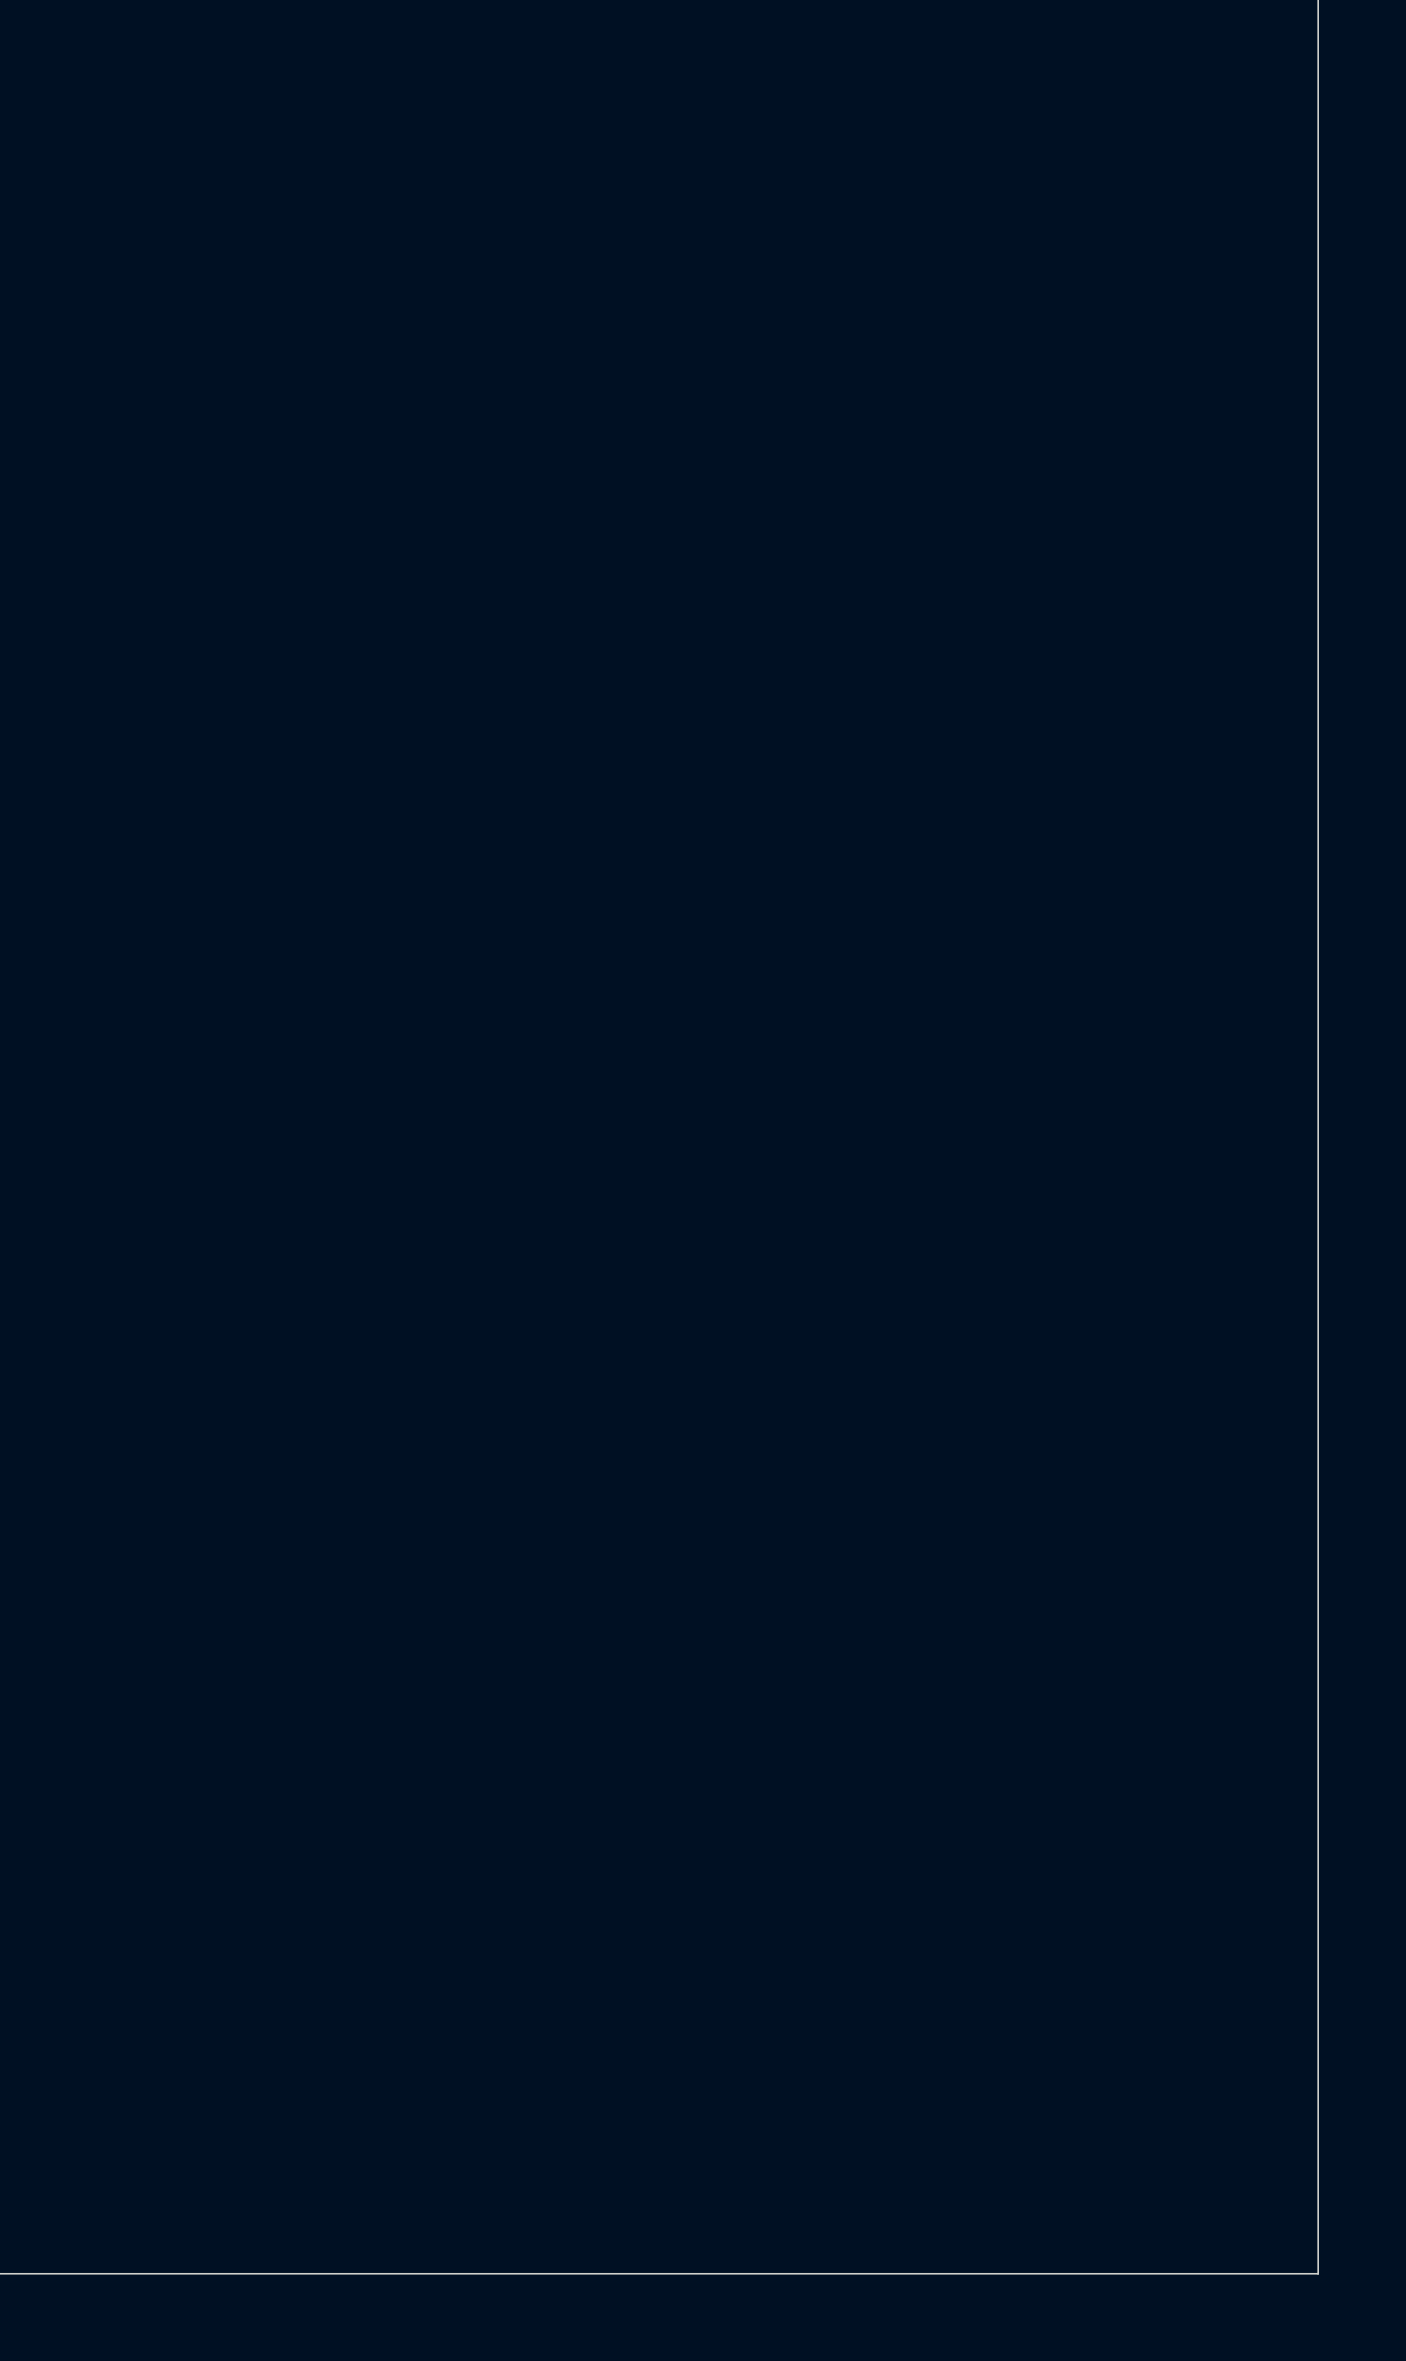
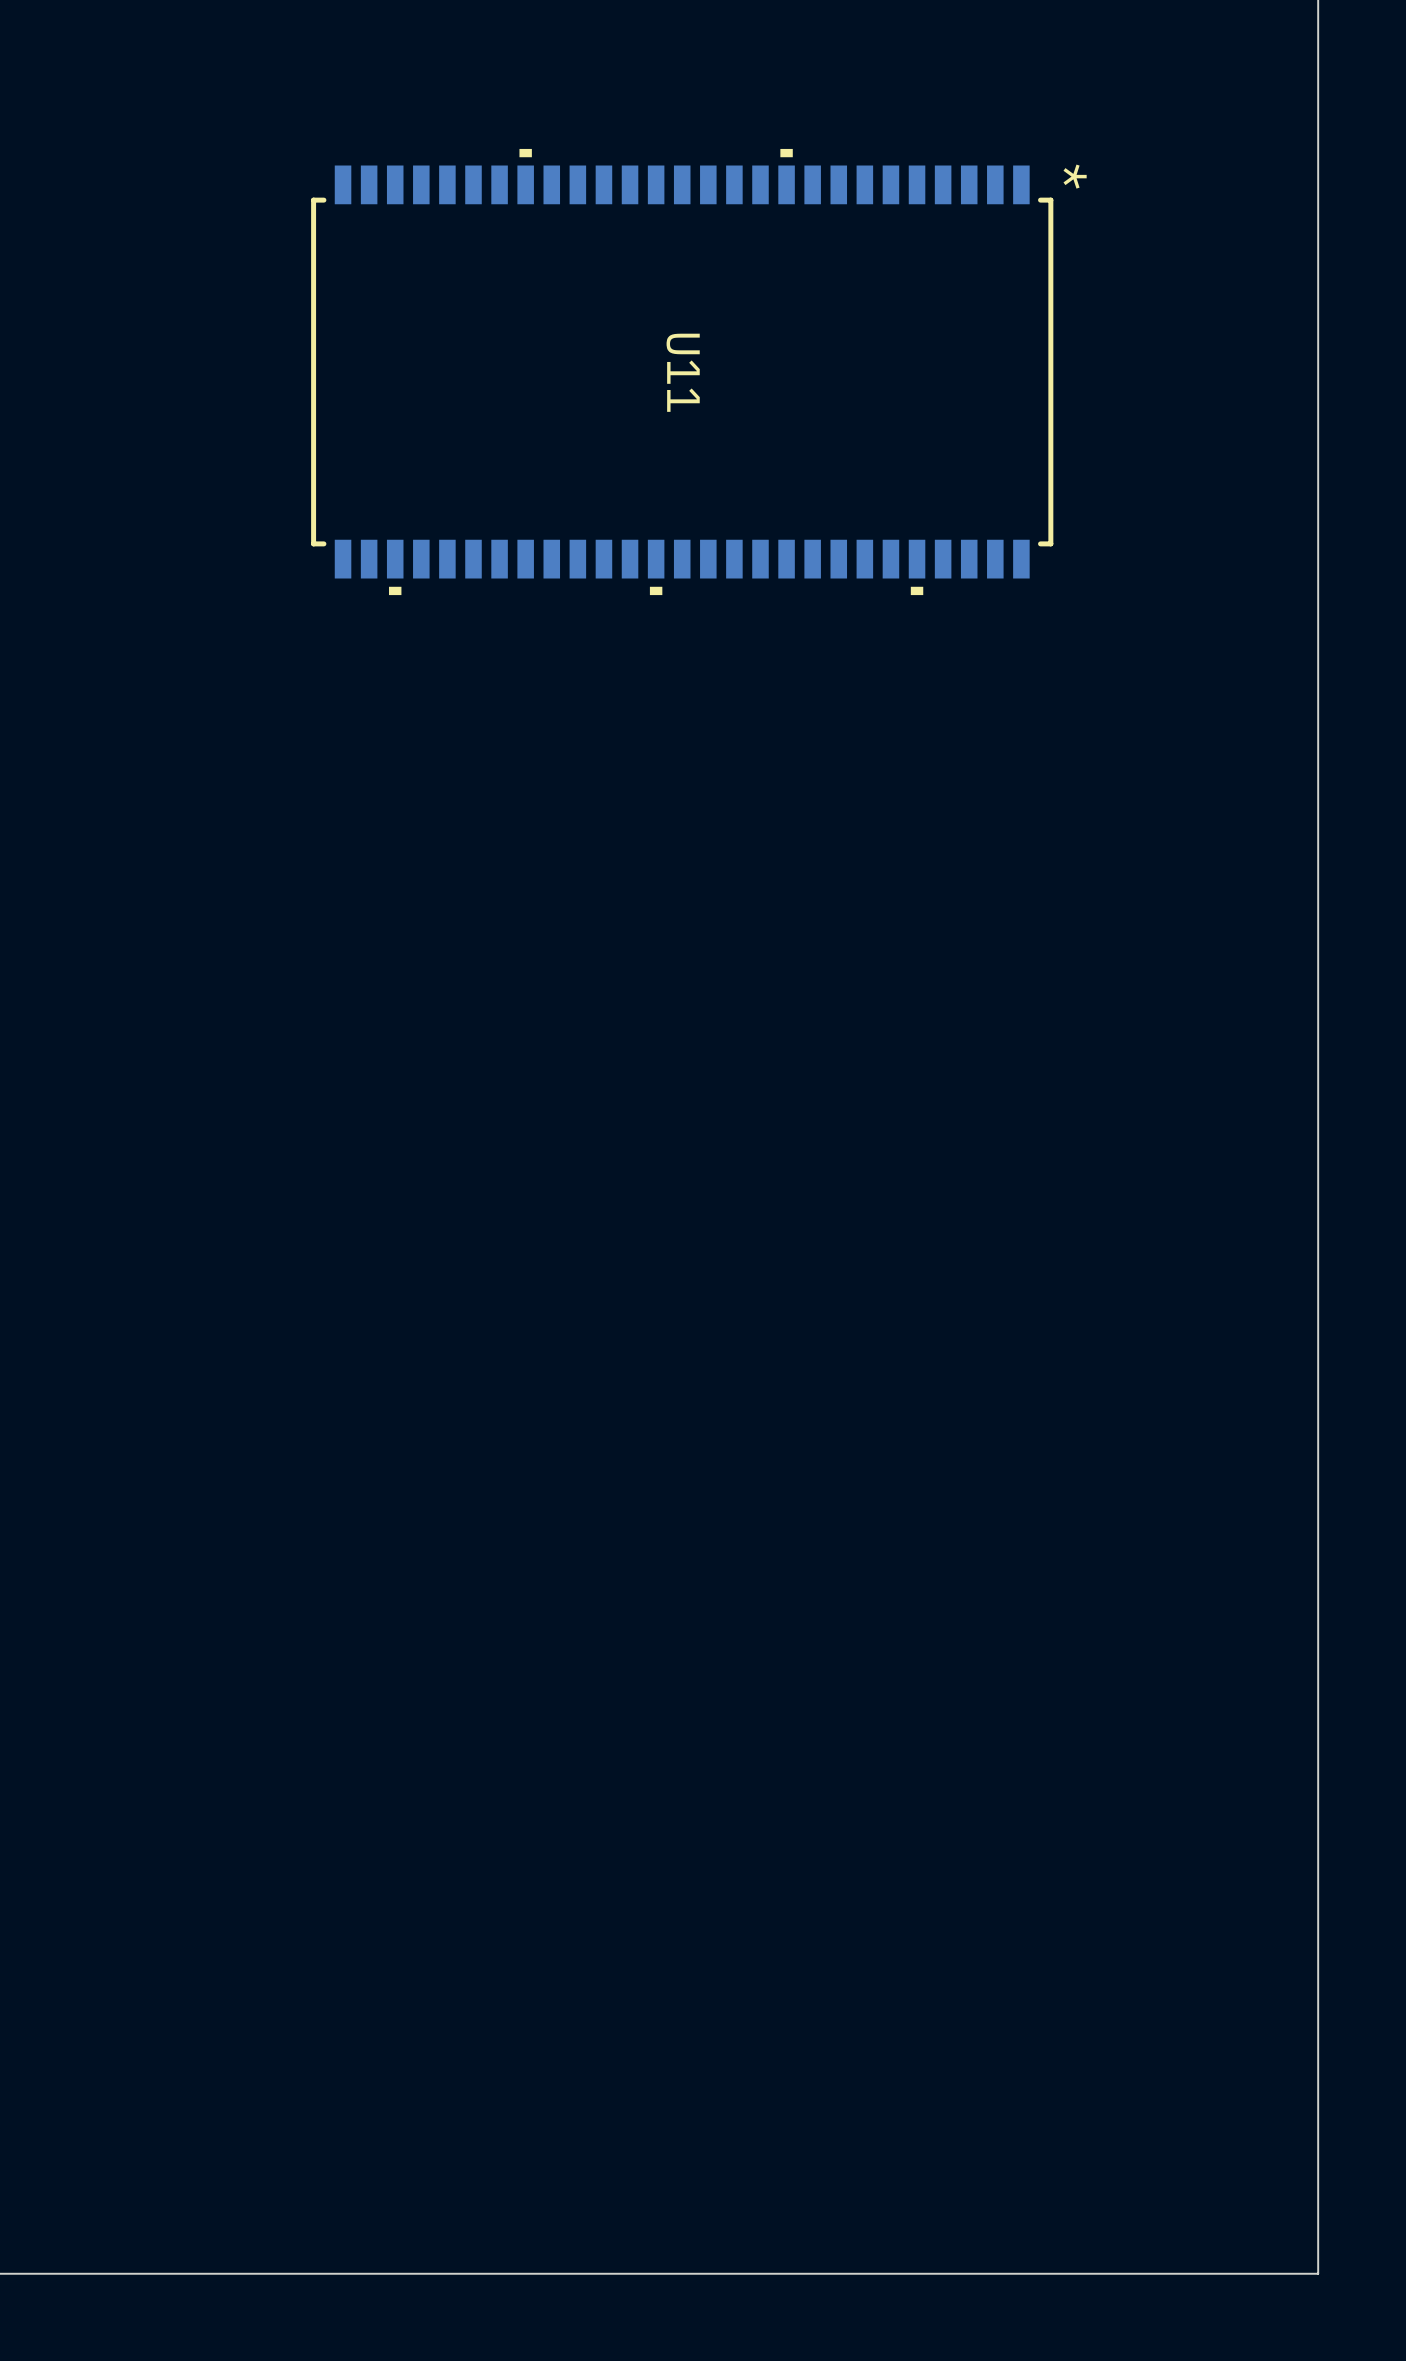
U11: none -> (682, 372)

